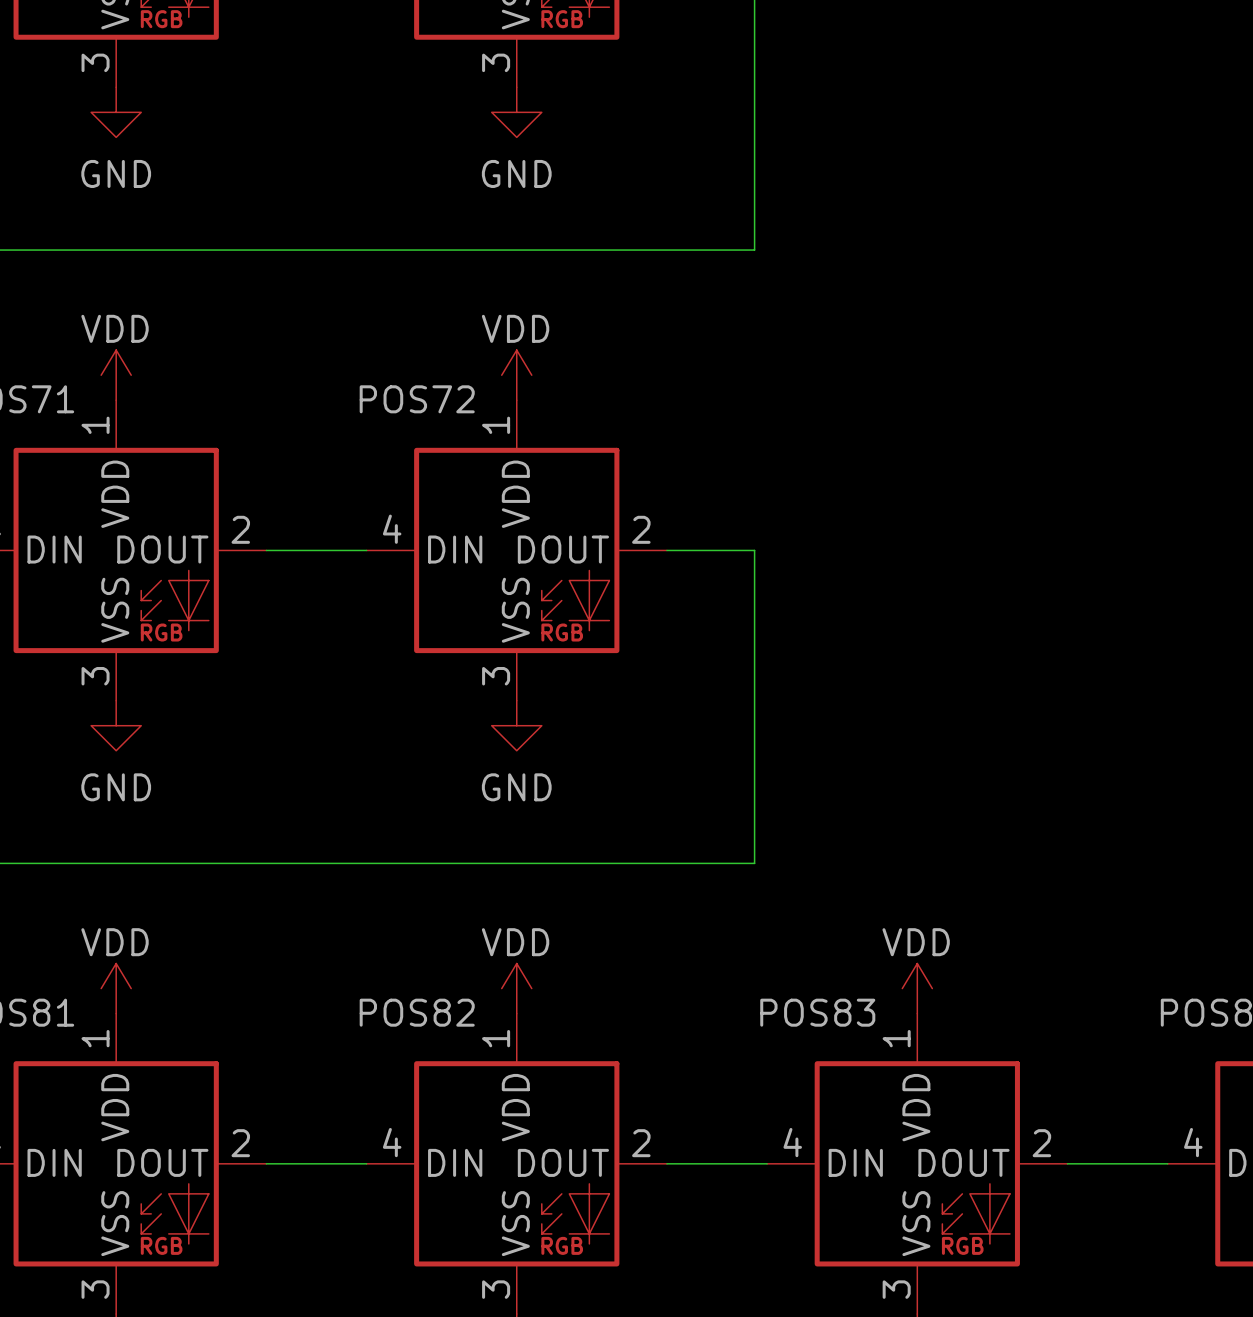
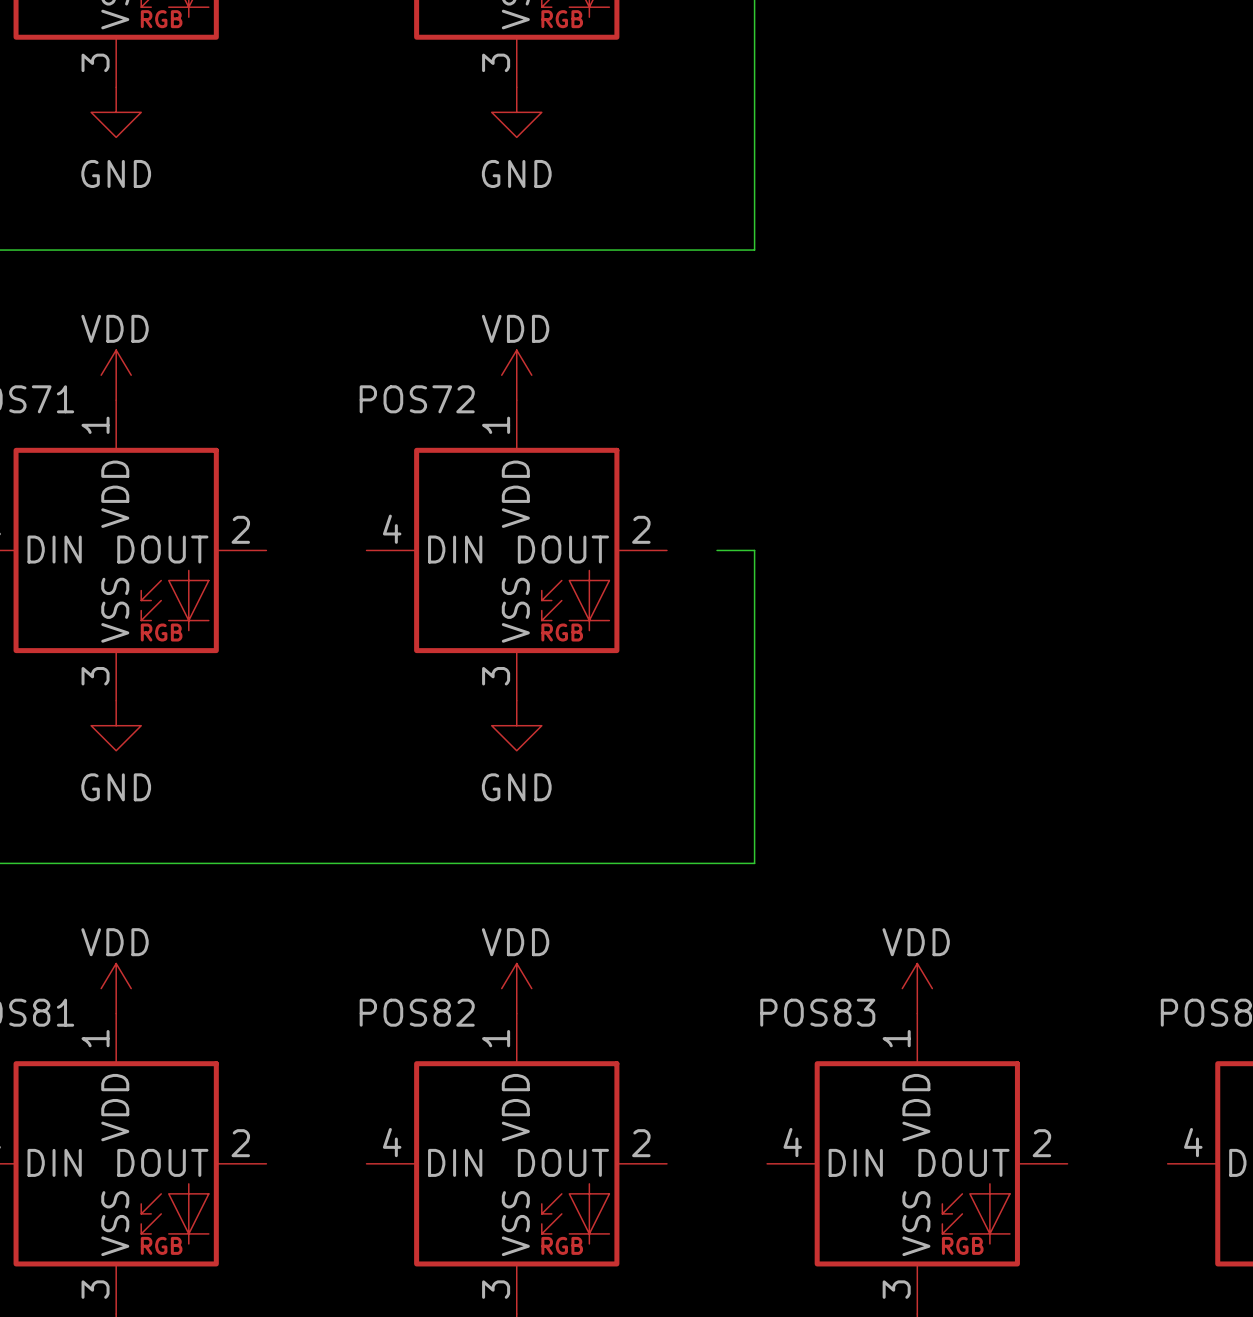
wire: (266, 550) (366, 550) -> none
wire: (666, 550) (717, 550) -> none
wire: (266, 1163) (366, 1163) -> none
wire: (666, 1163) (767, 1163) -> none
wire: (1067, 1163) (1167, 1163) -> none

